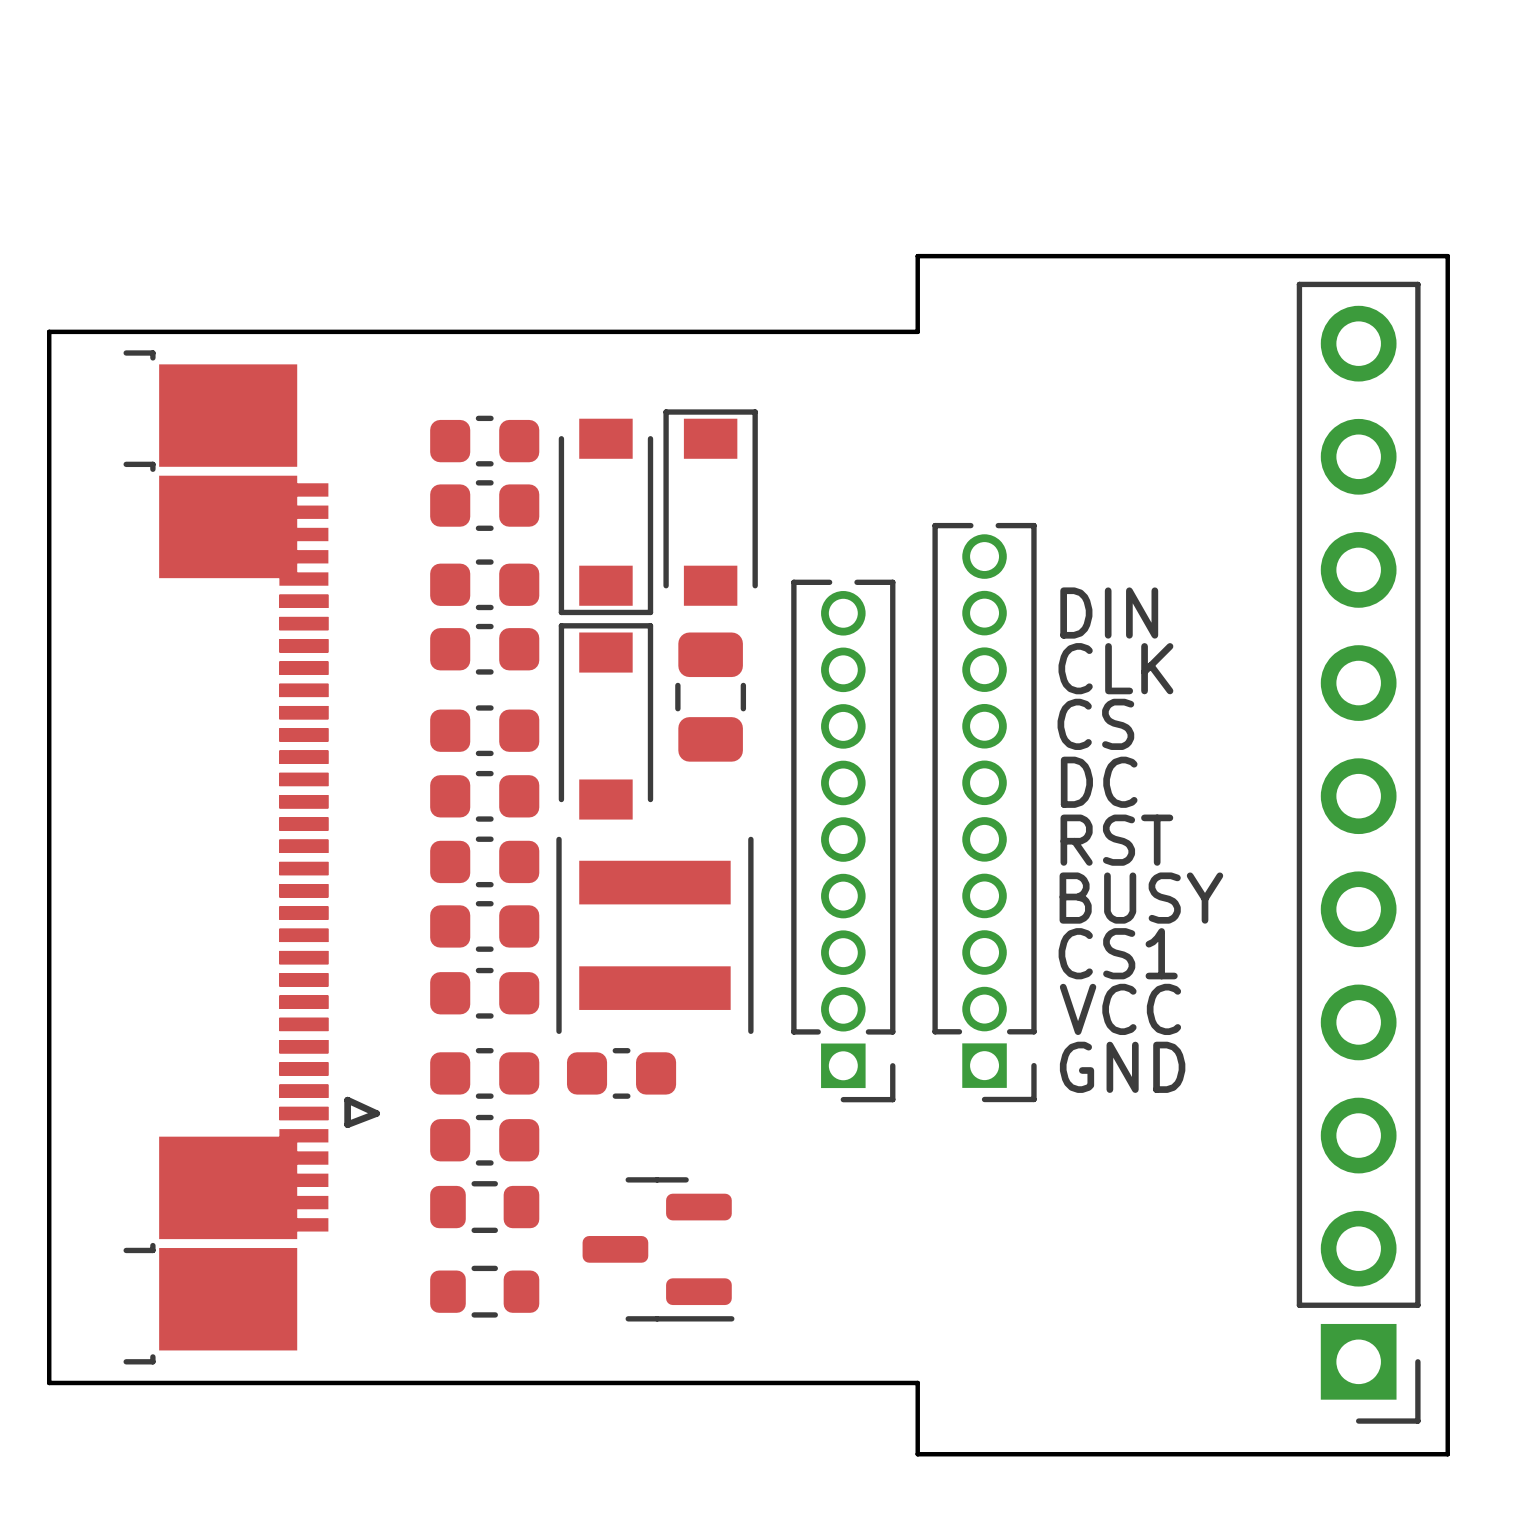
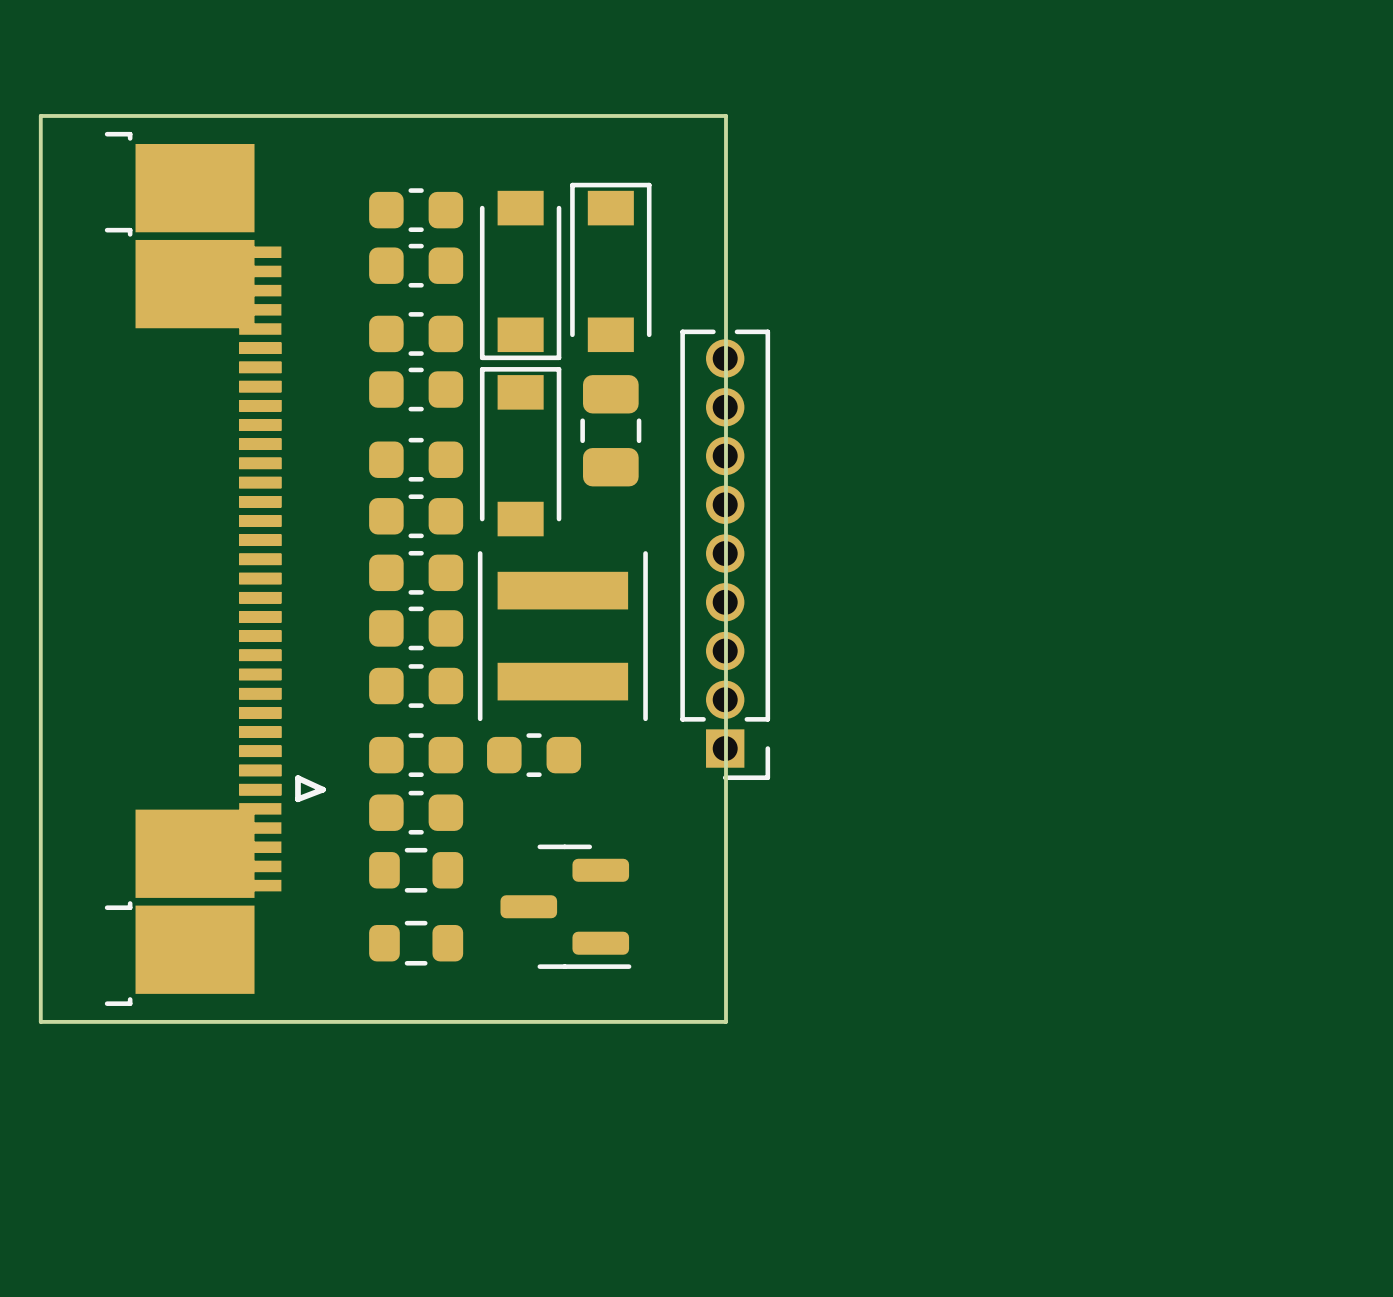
board edge: (844, 331) (917, 331) (917, 256) (1447, 256) (1447, 1454) (917, 1454) (917, 1382) (844, 1382) -> (725, 115) (725, 1021)
text: DIN (1109, 613) -> none
text: CLK (1115, 668) -> none
text: CS (1095, 724) -> none
text: DC (1099, 782) -> none
part: (984, 812) -> none
text: RST (1116, 840) -> none
part: (1358, 852) -> none
text: BUSY (1141, 898) -> none
text: CS1 (1118, 953) -> none
text: VCC (1120, 1009) -> none
text: GND (1122, 1067) -> none

